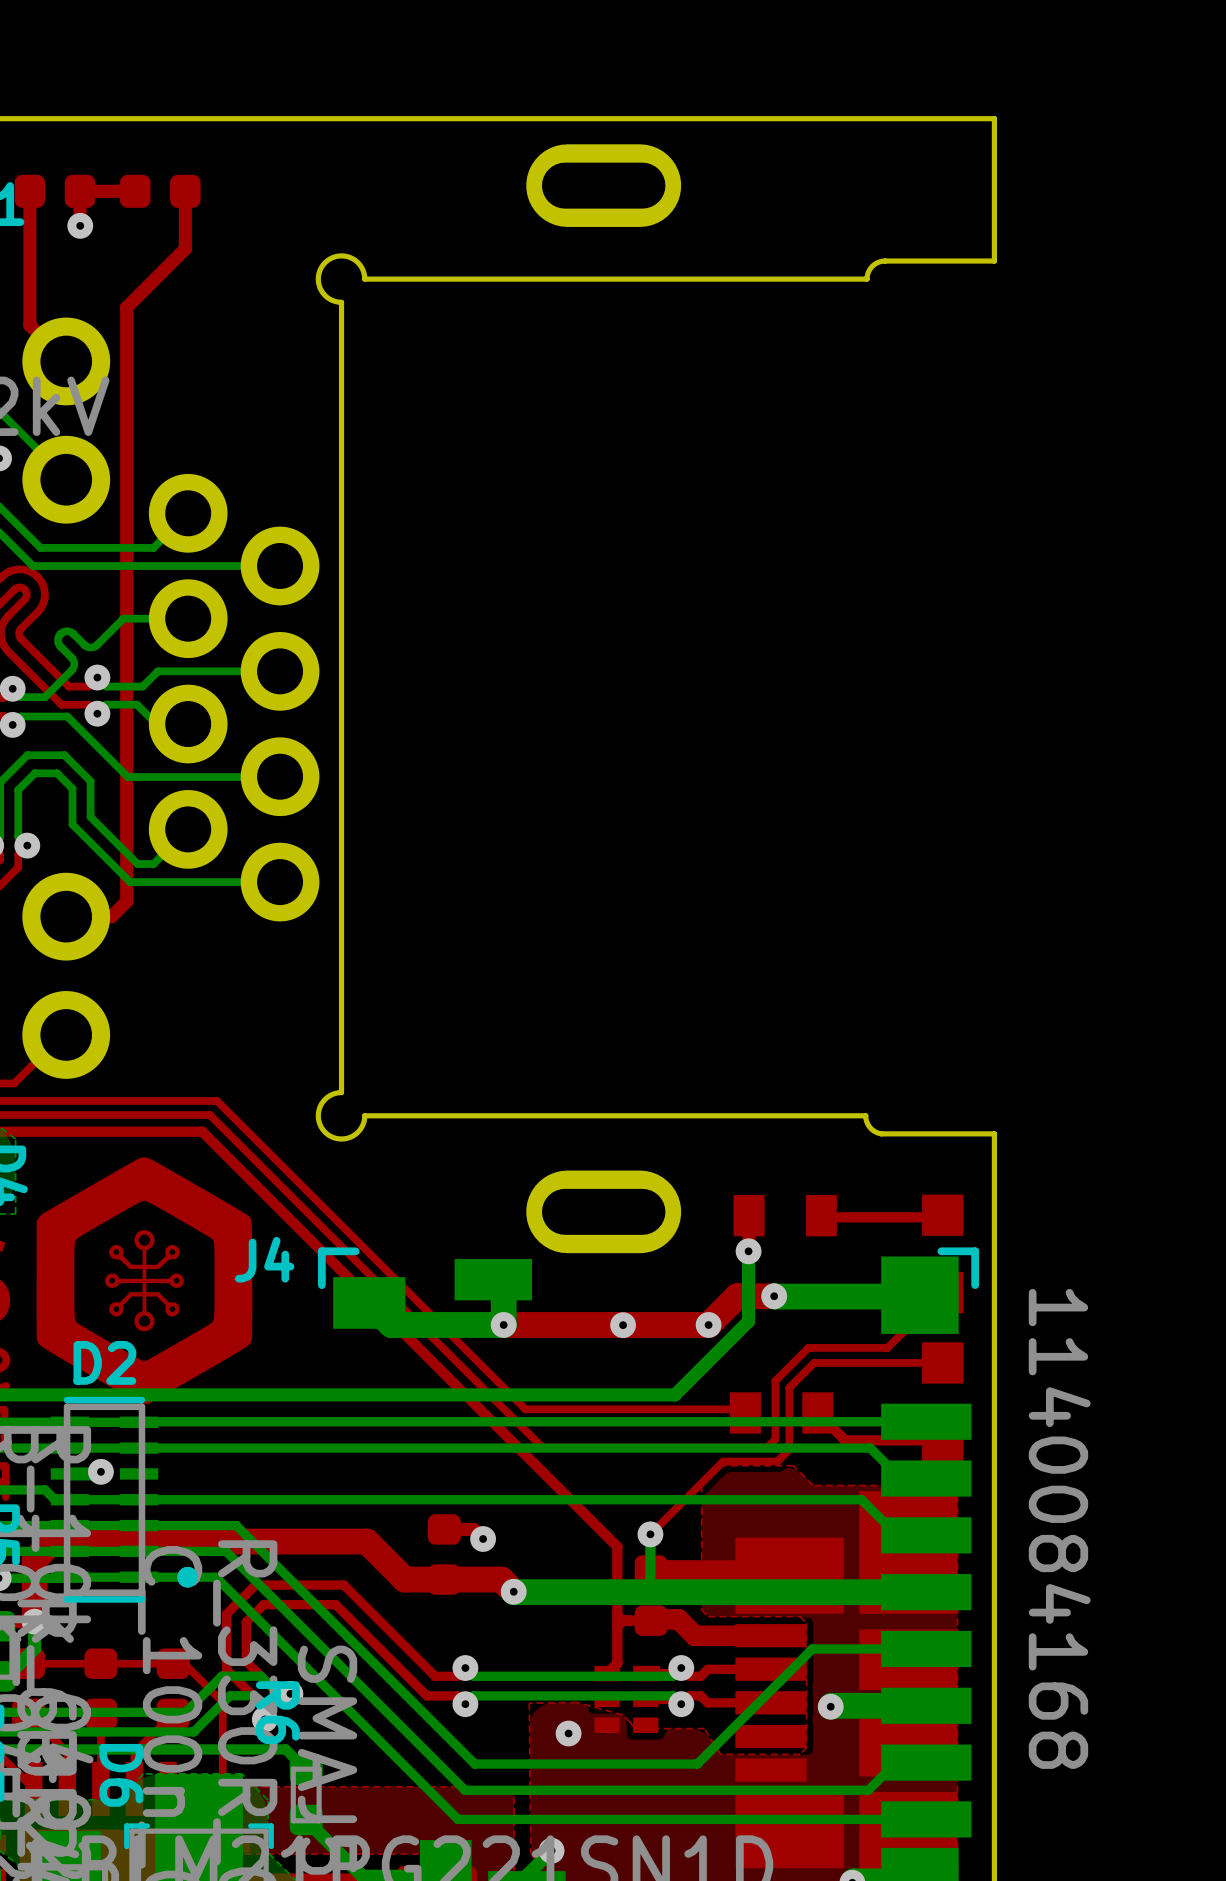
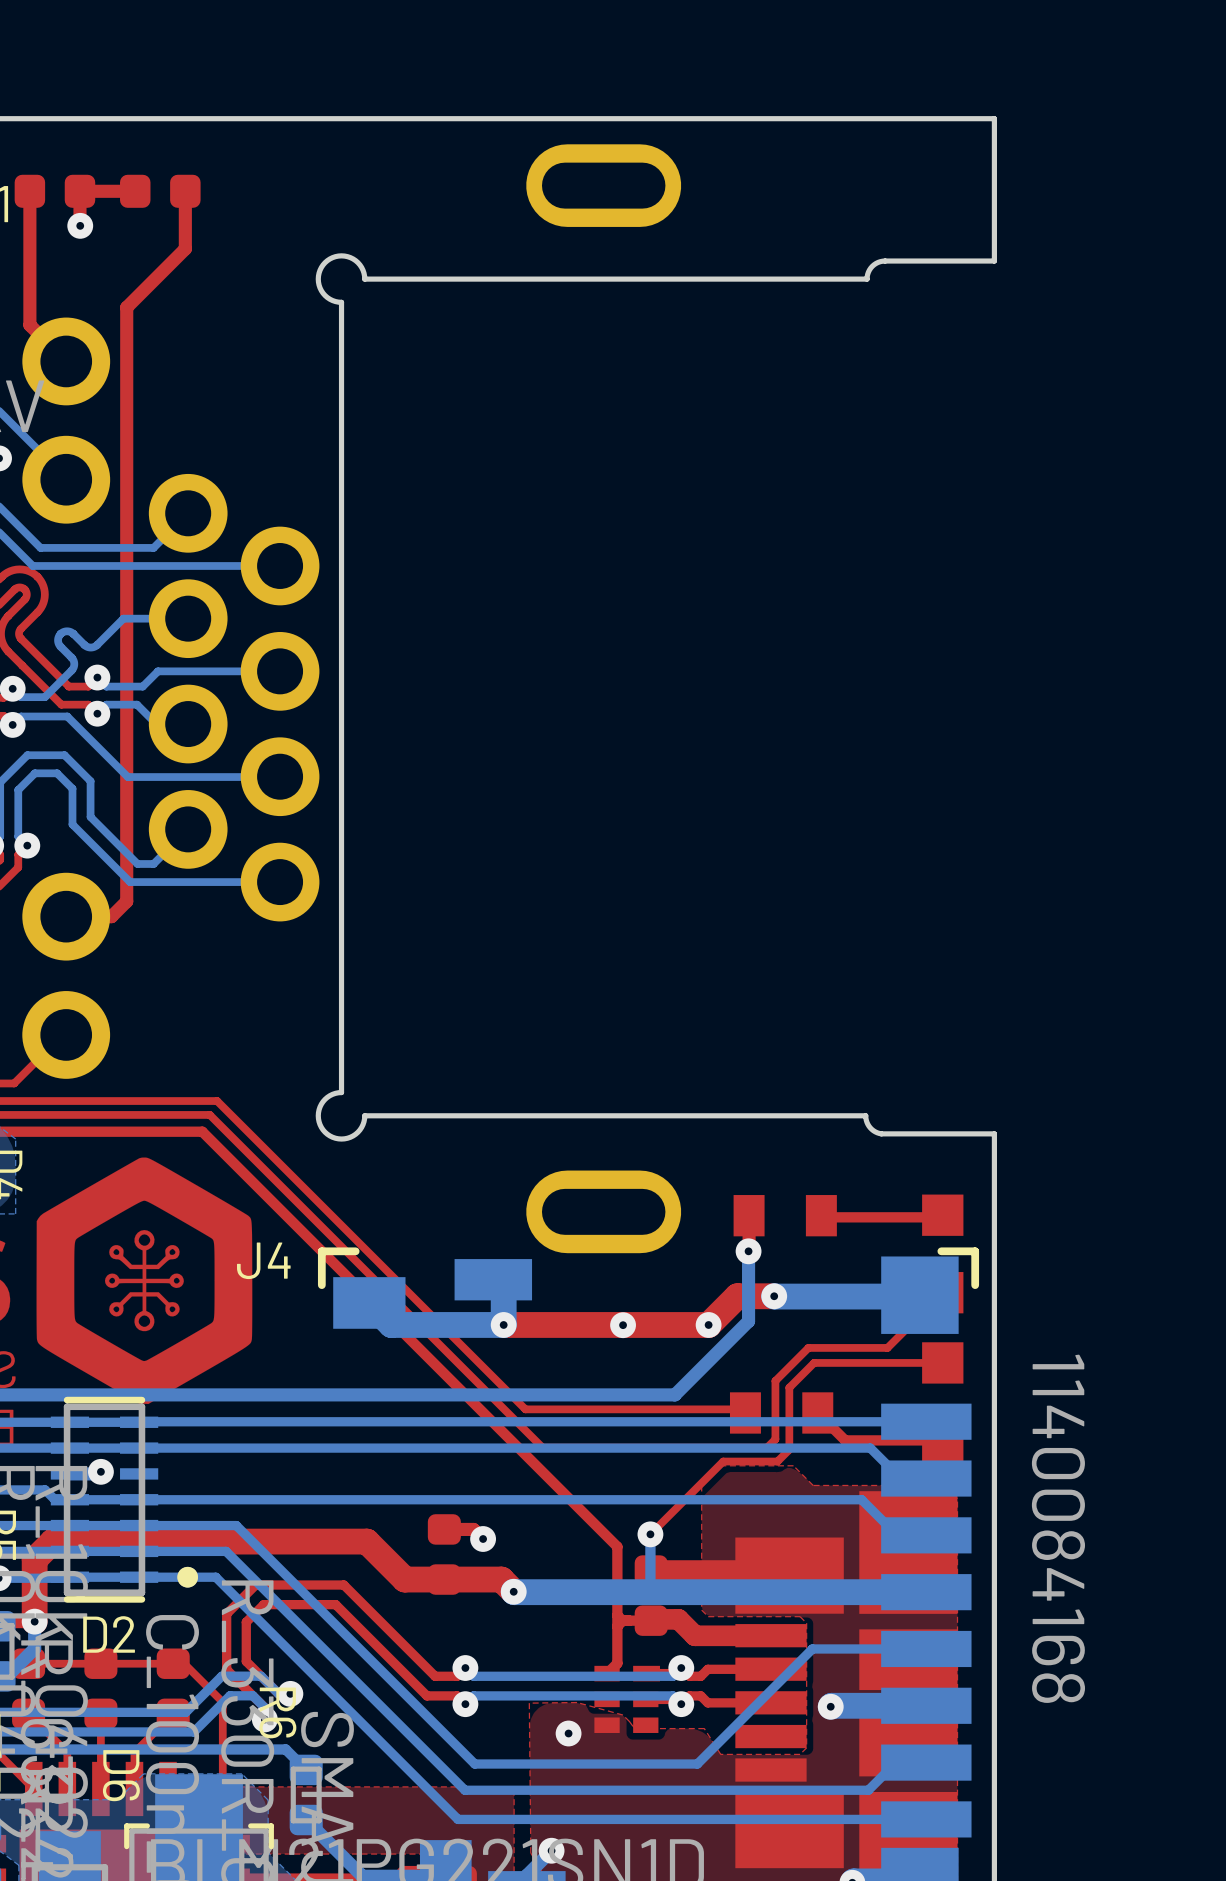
D2 name position: D2 (104, 1362) -> D2 (109, 1634)

